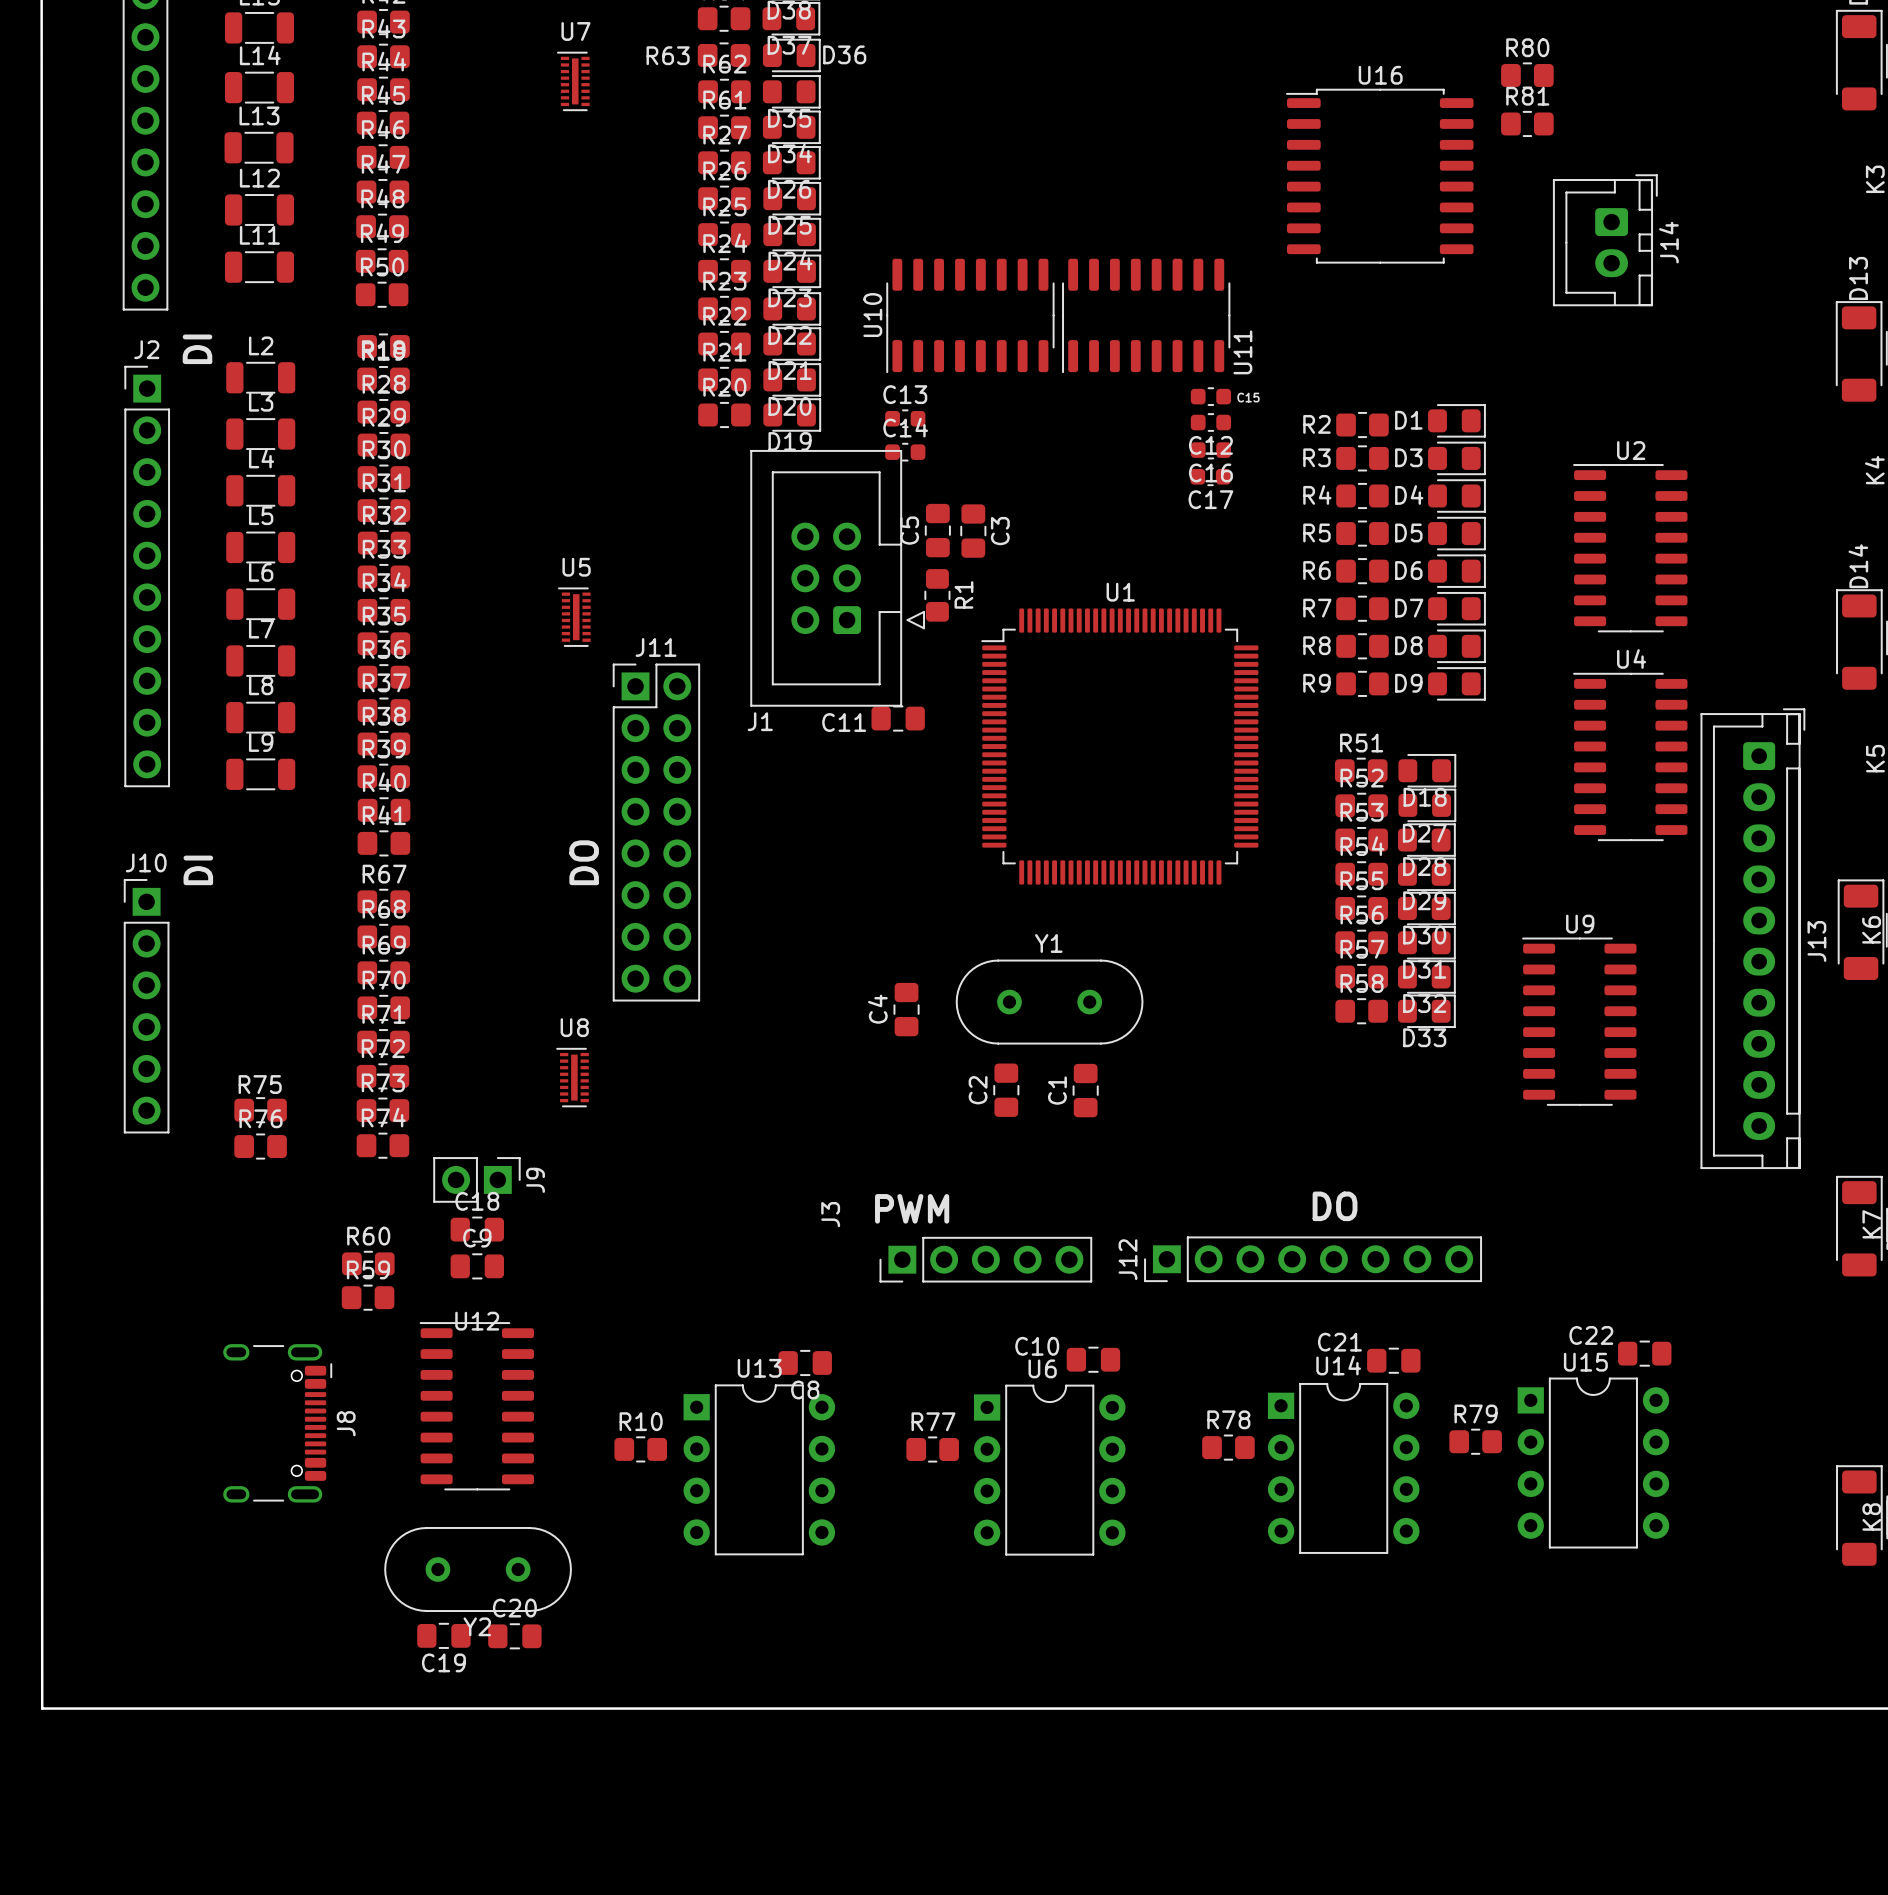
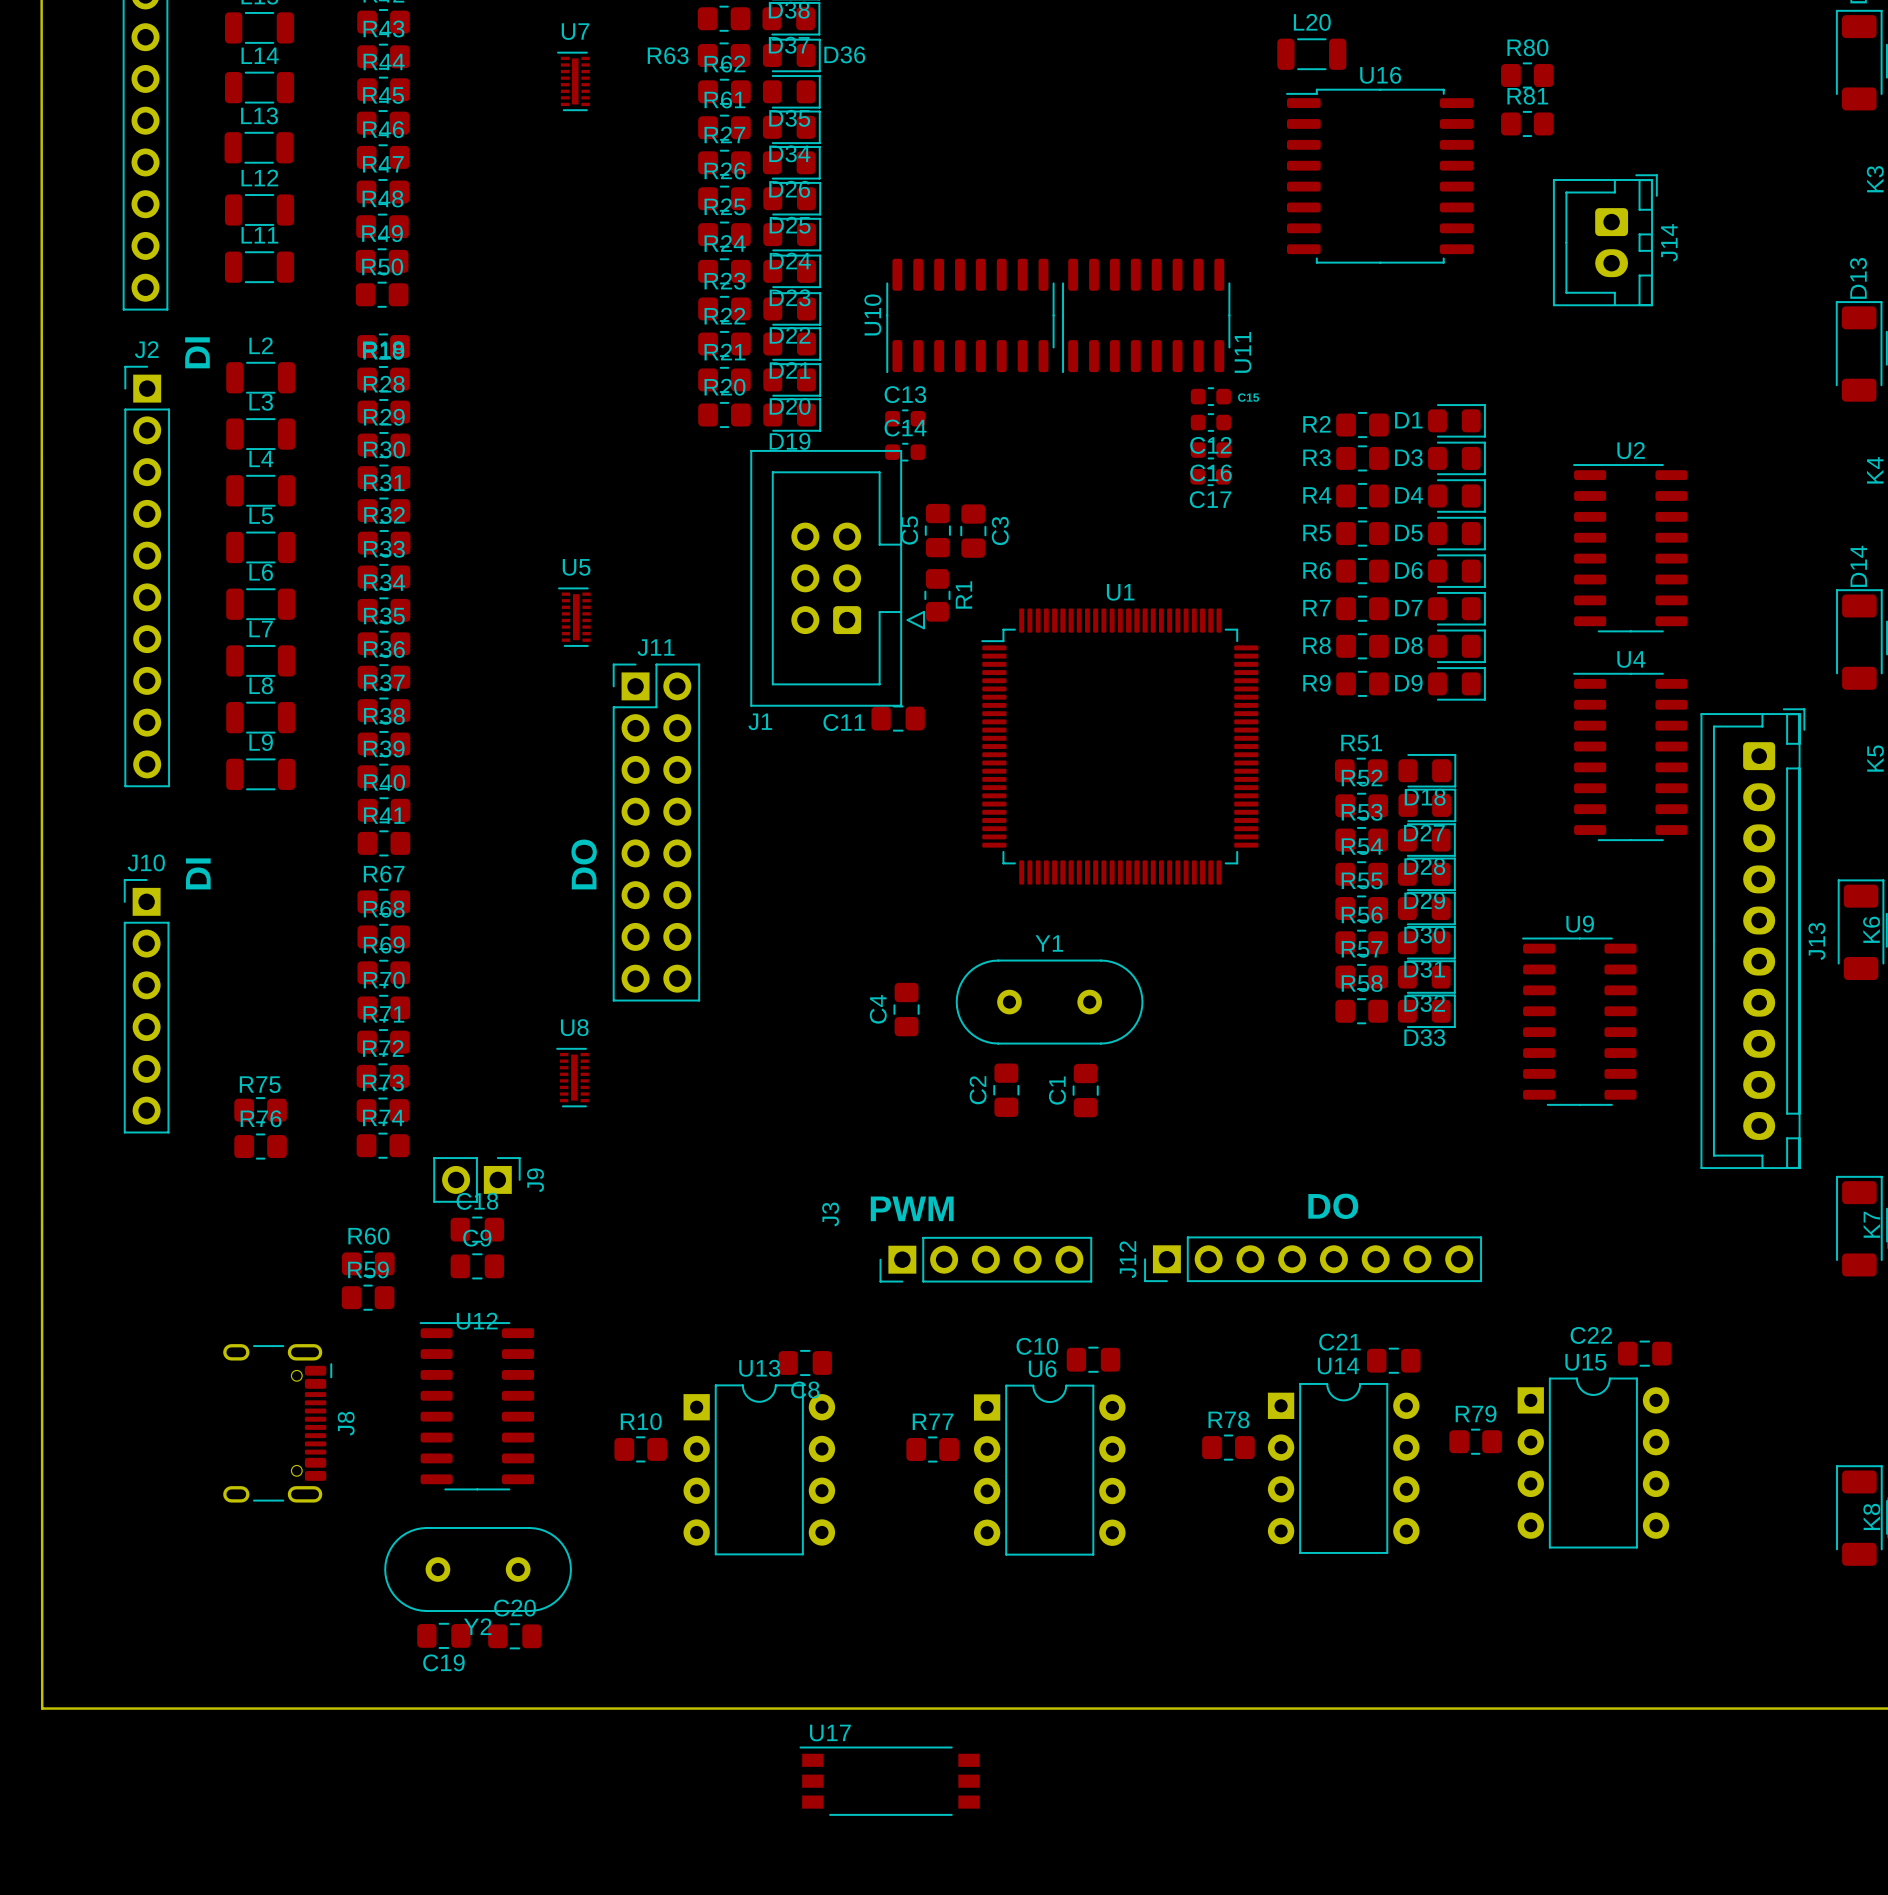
L20: none -> (1311, 54)
U17: none -> (889, 1781)

